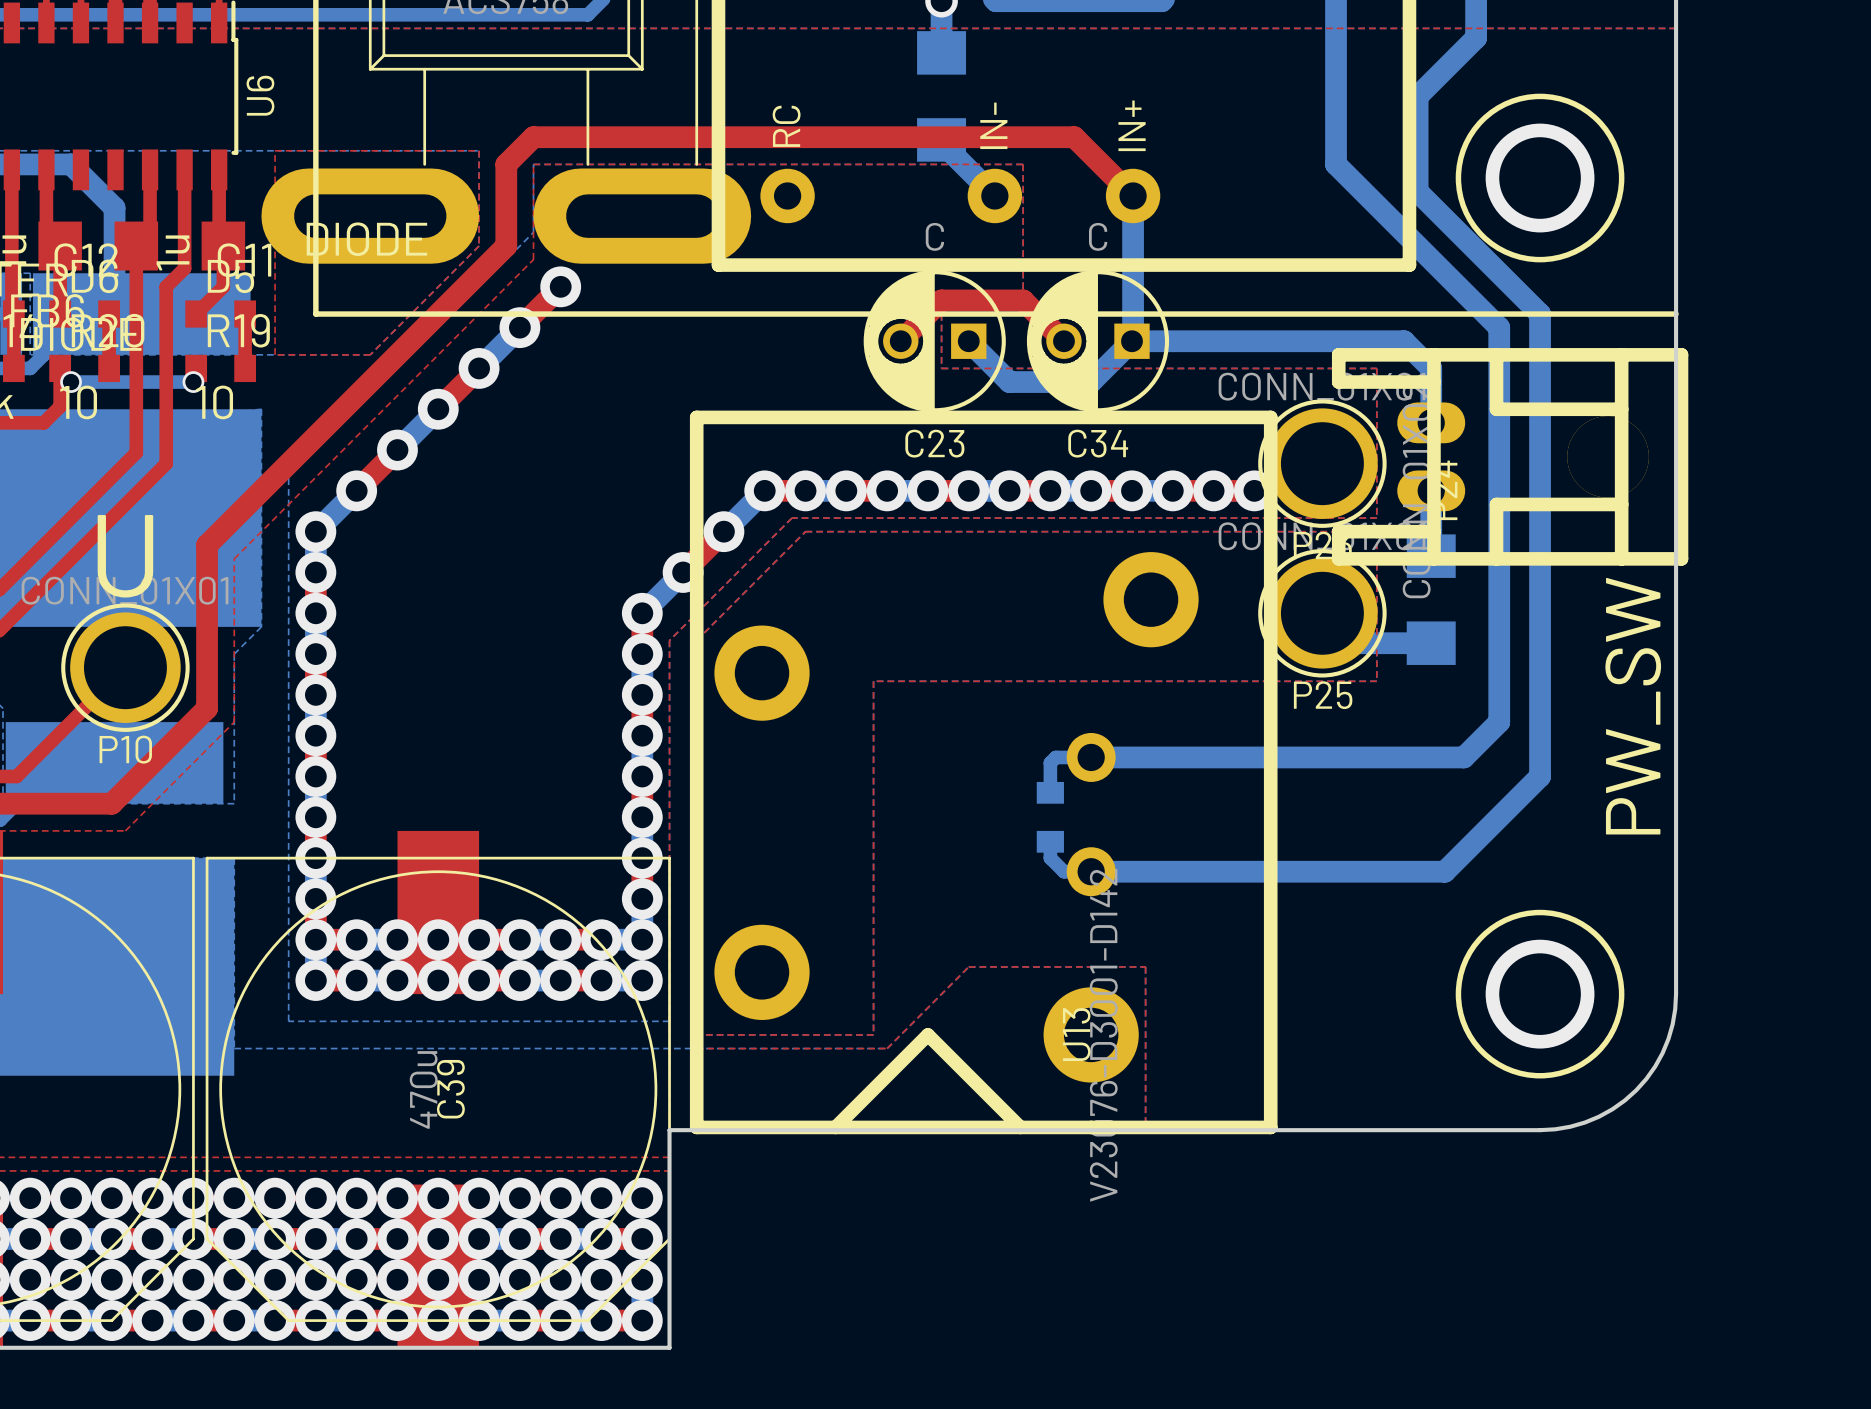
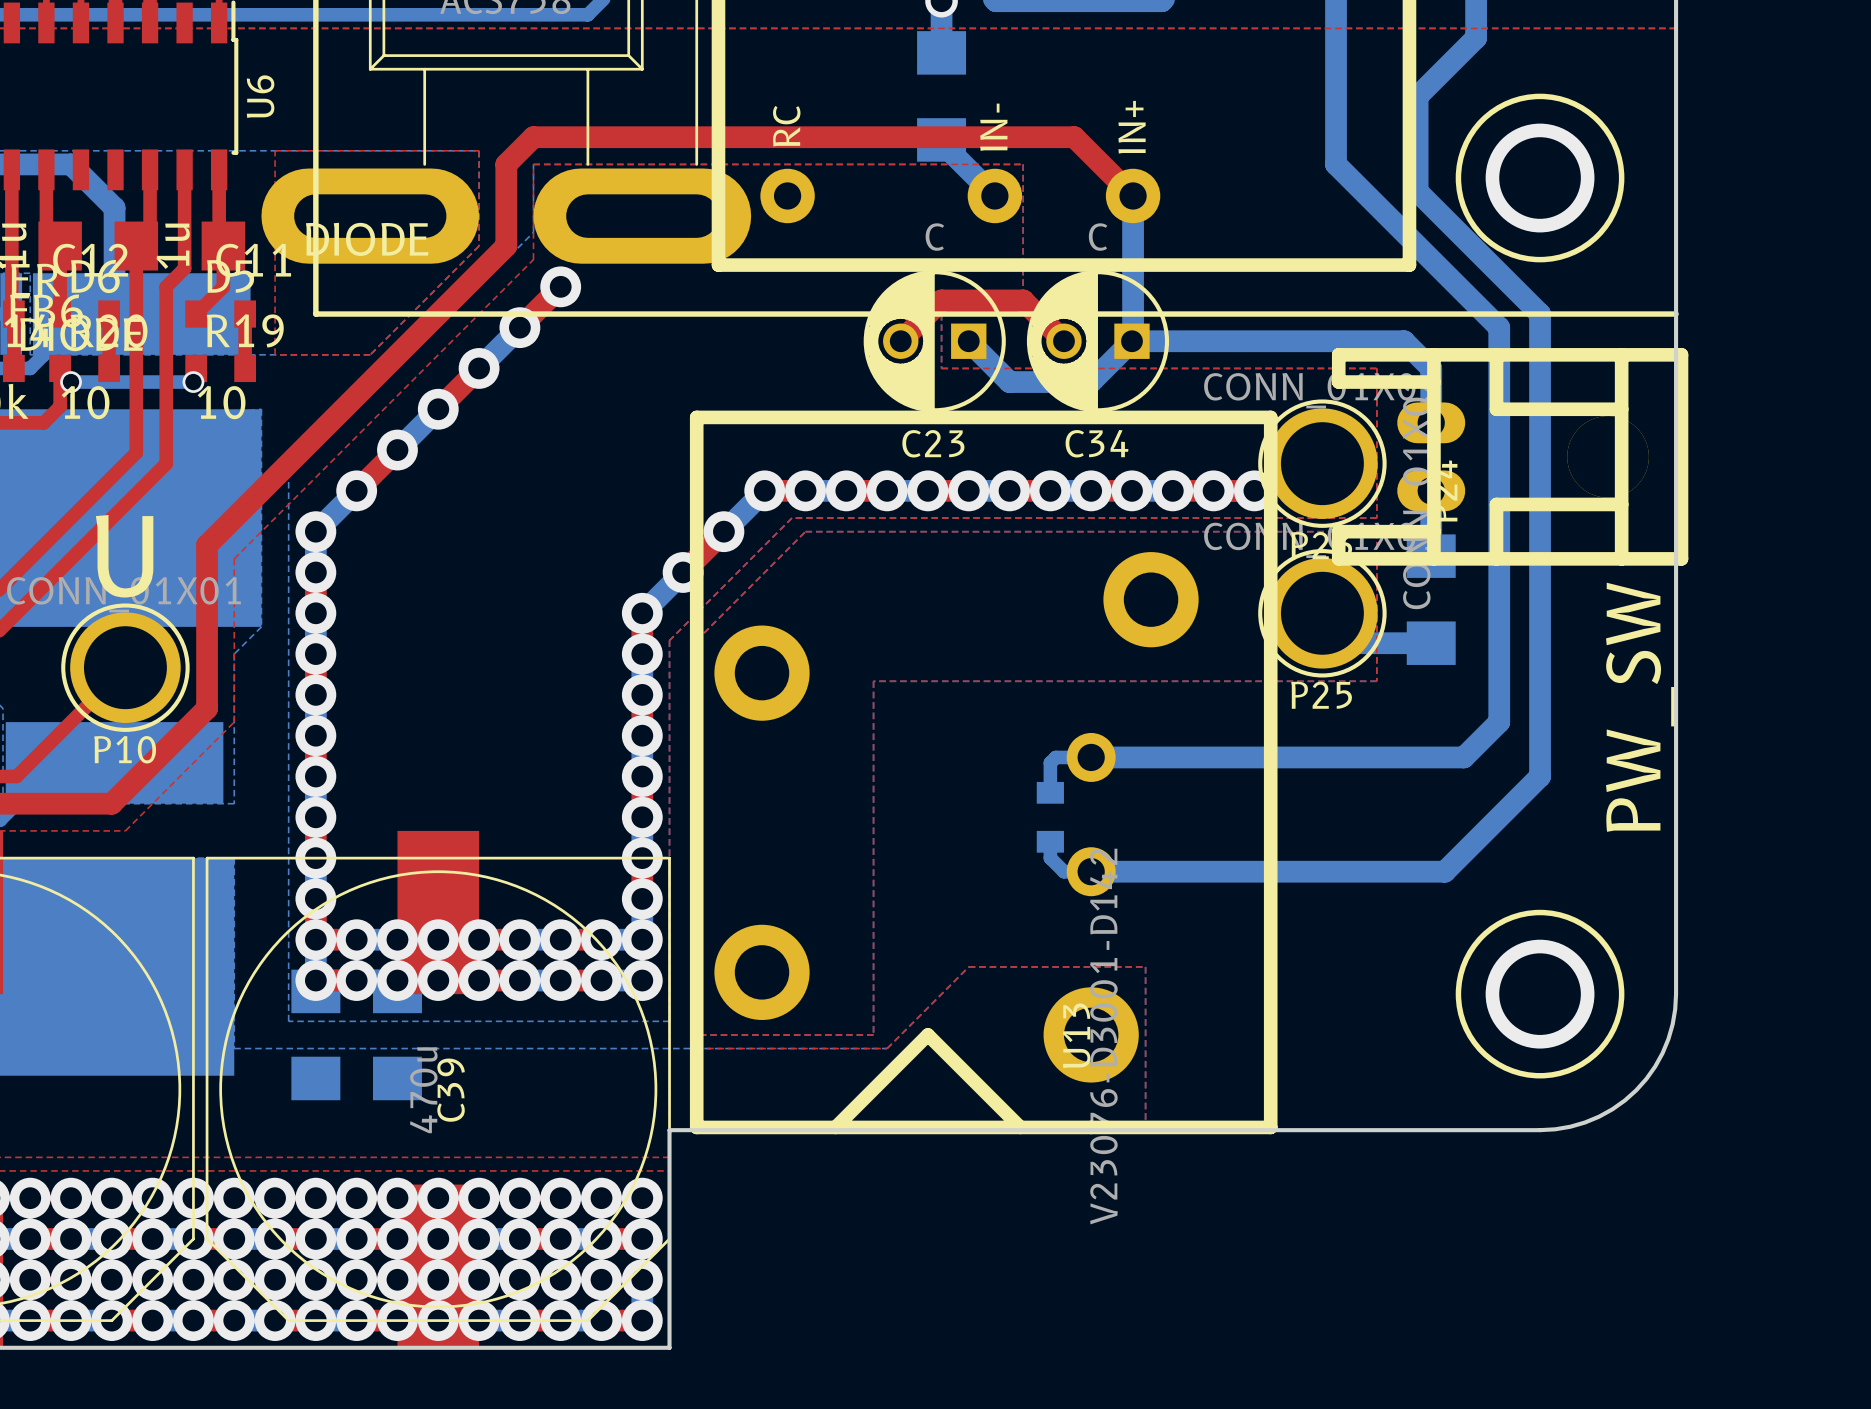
part: none -> (315, 1034)
part: none -> (397, 1034)

